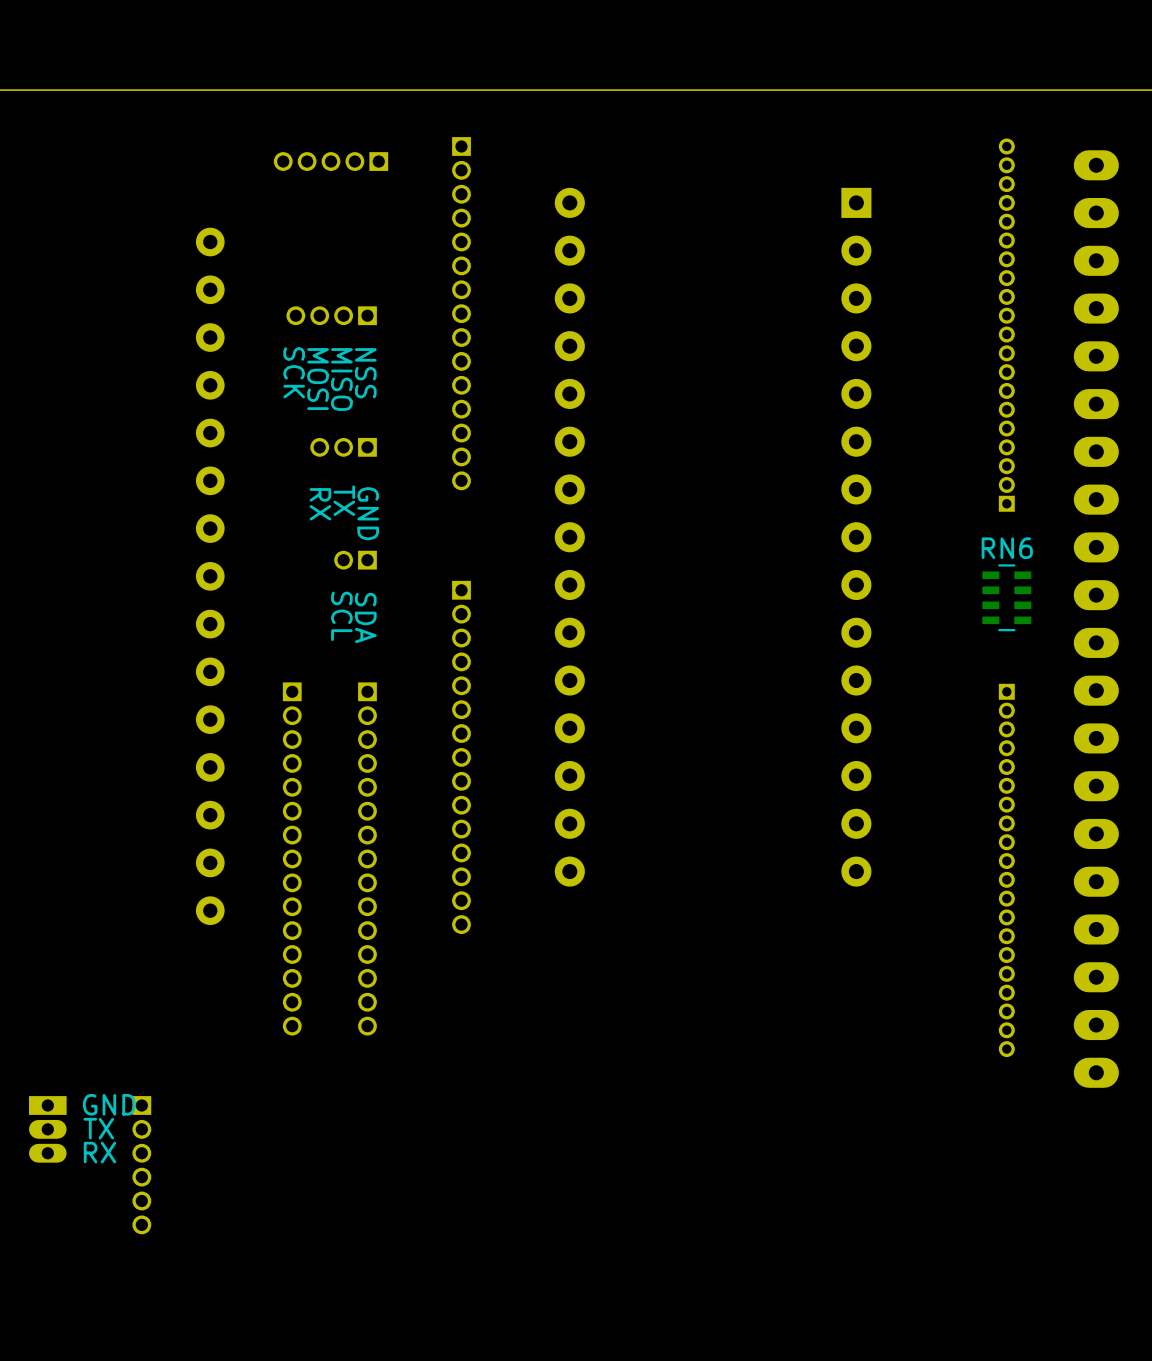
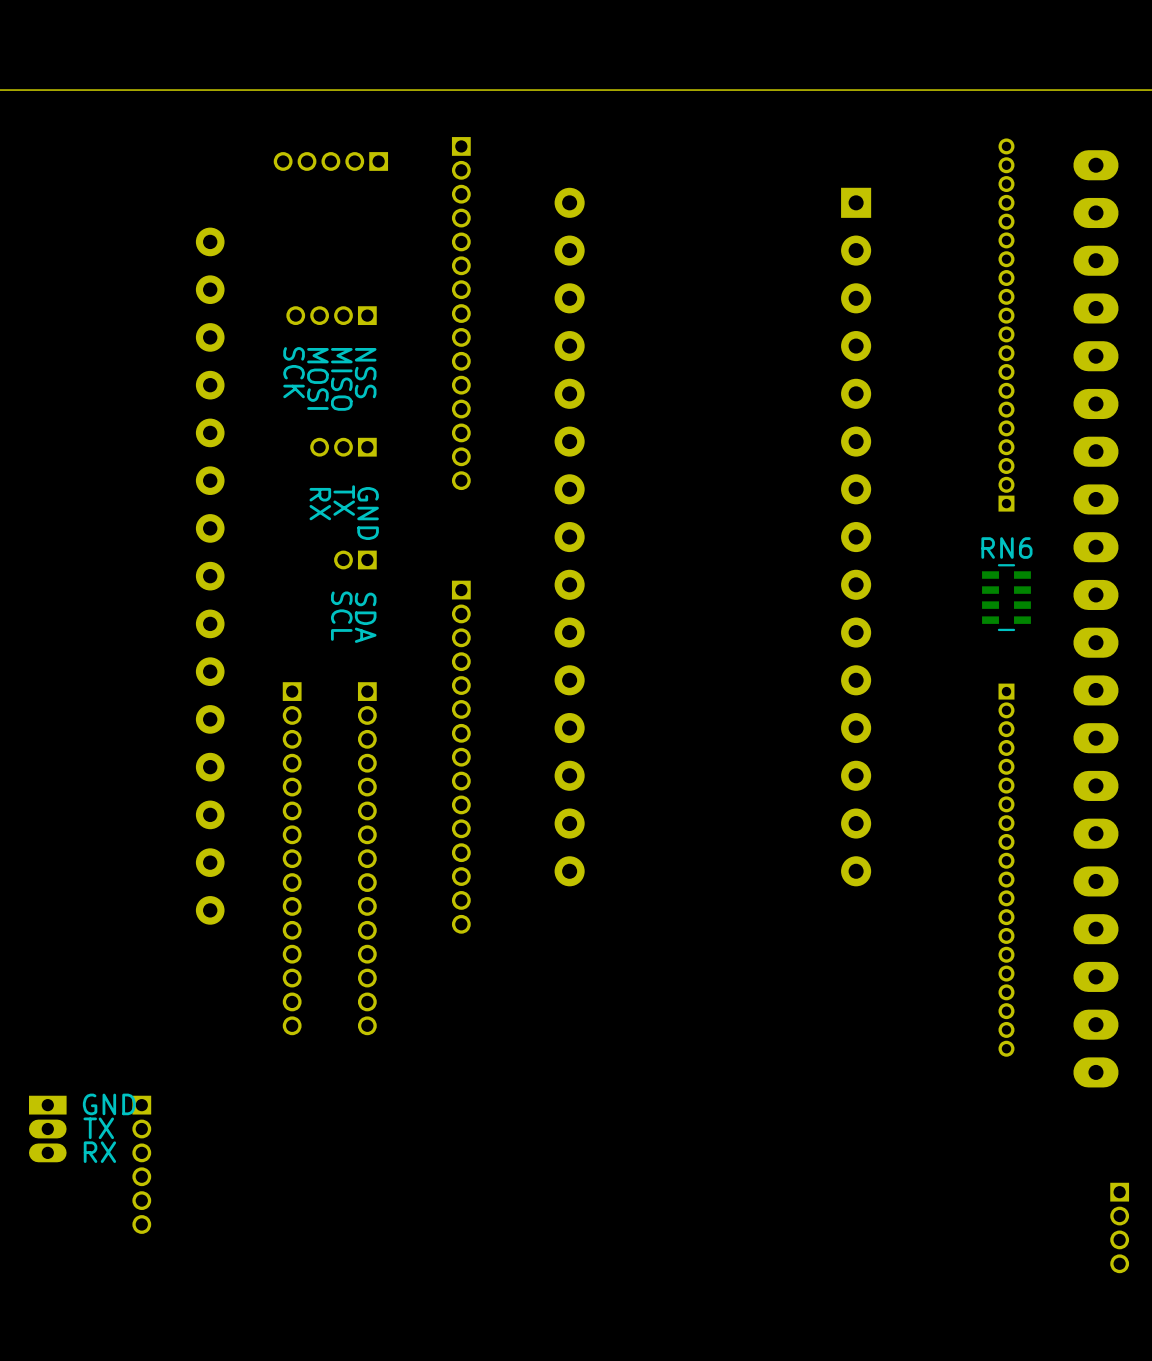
part: none -> (1119, 1227)

